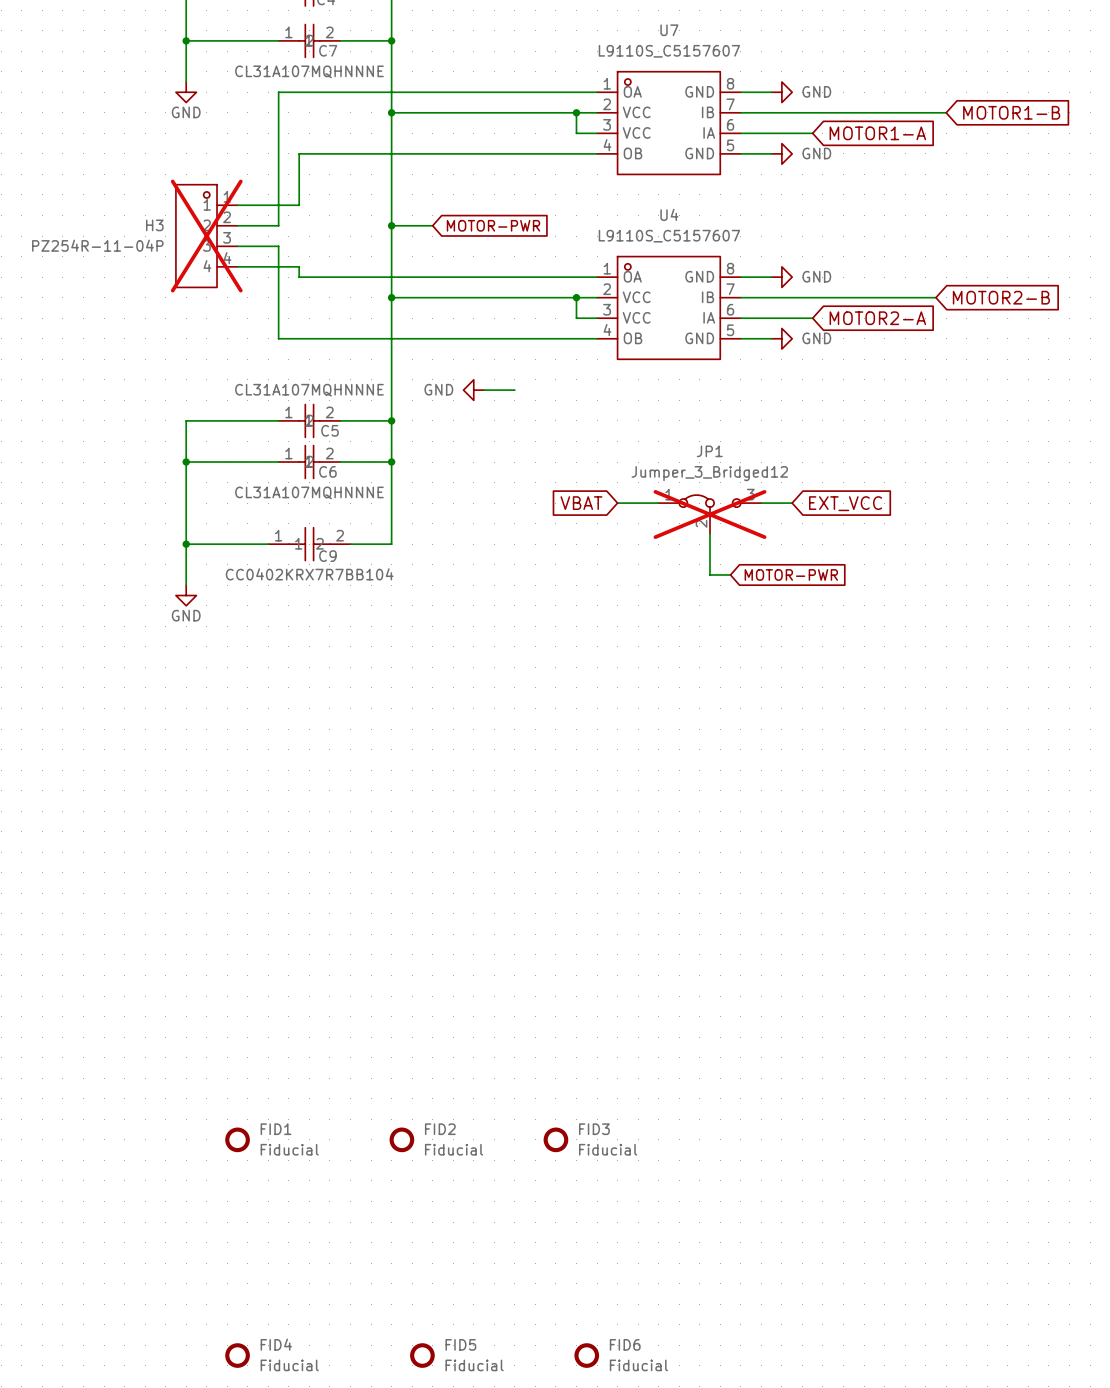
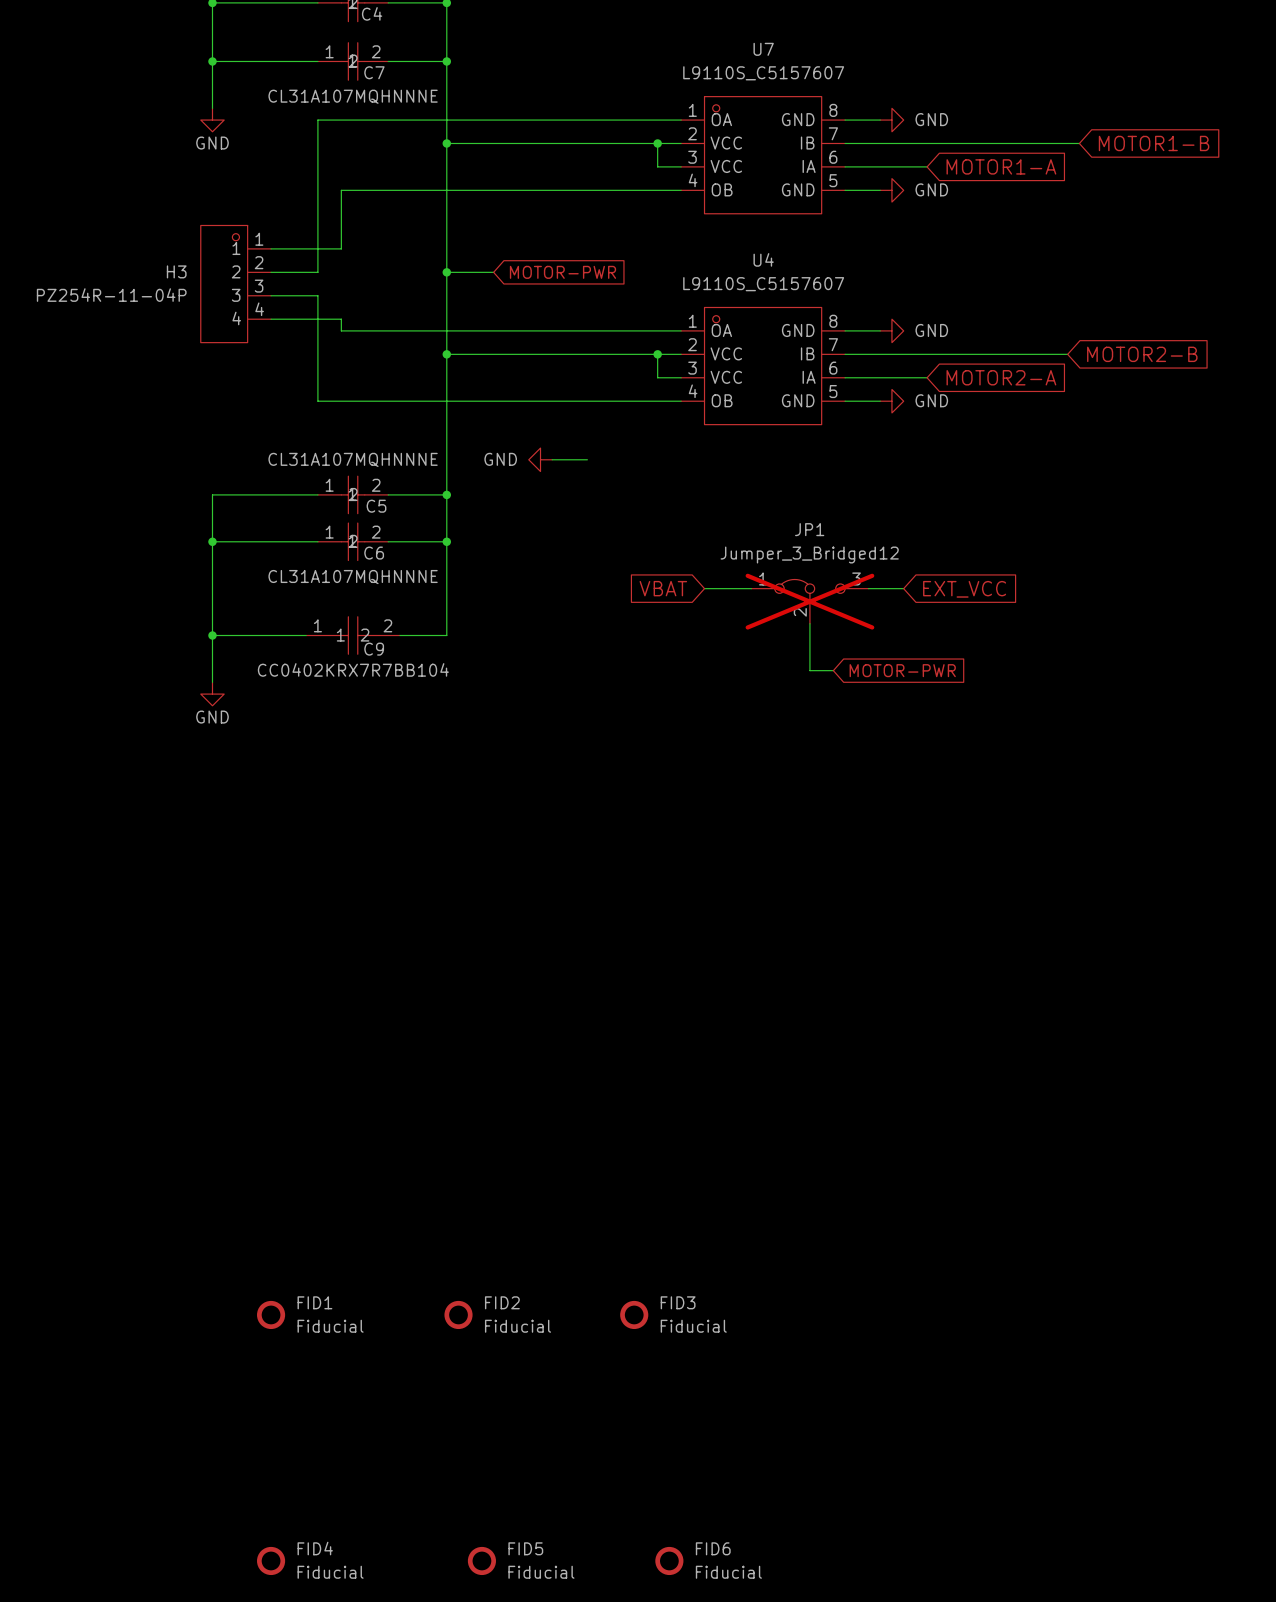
H3 do-not-place cross: (206, 236) -> none

